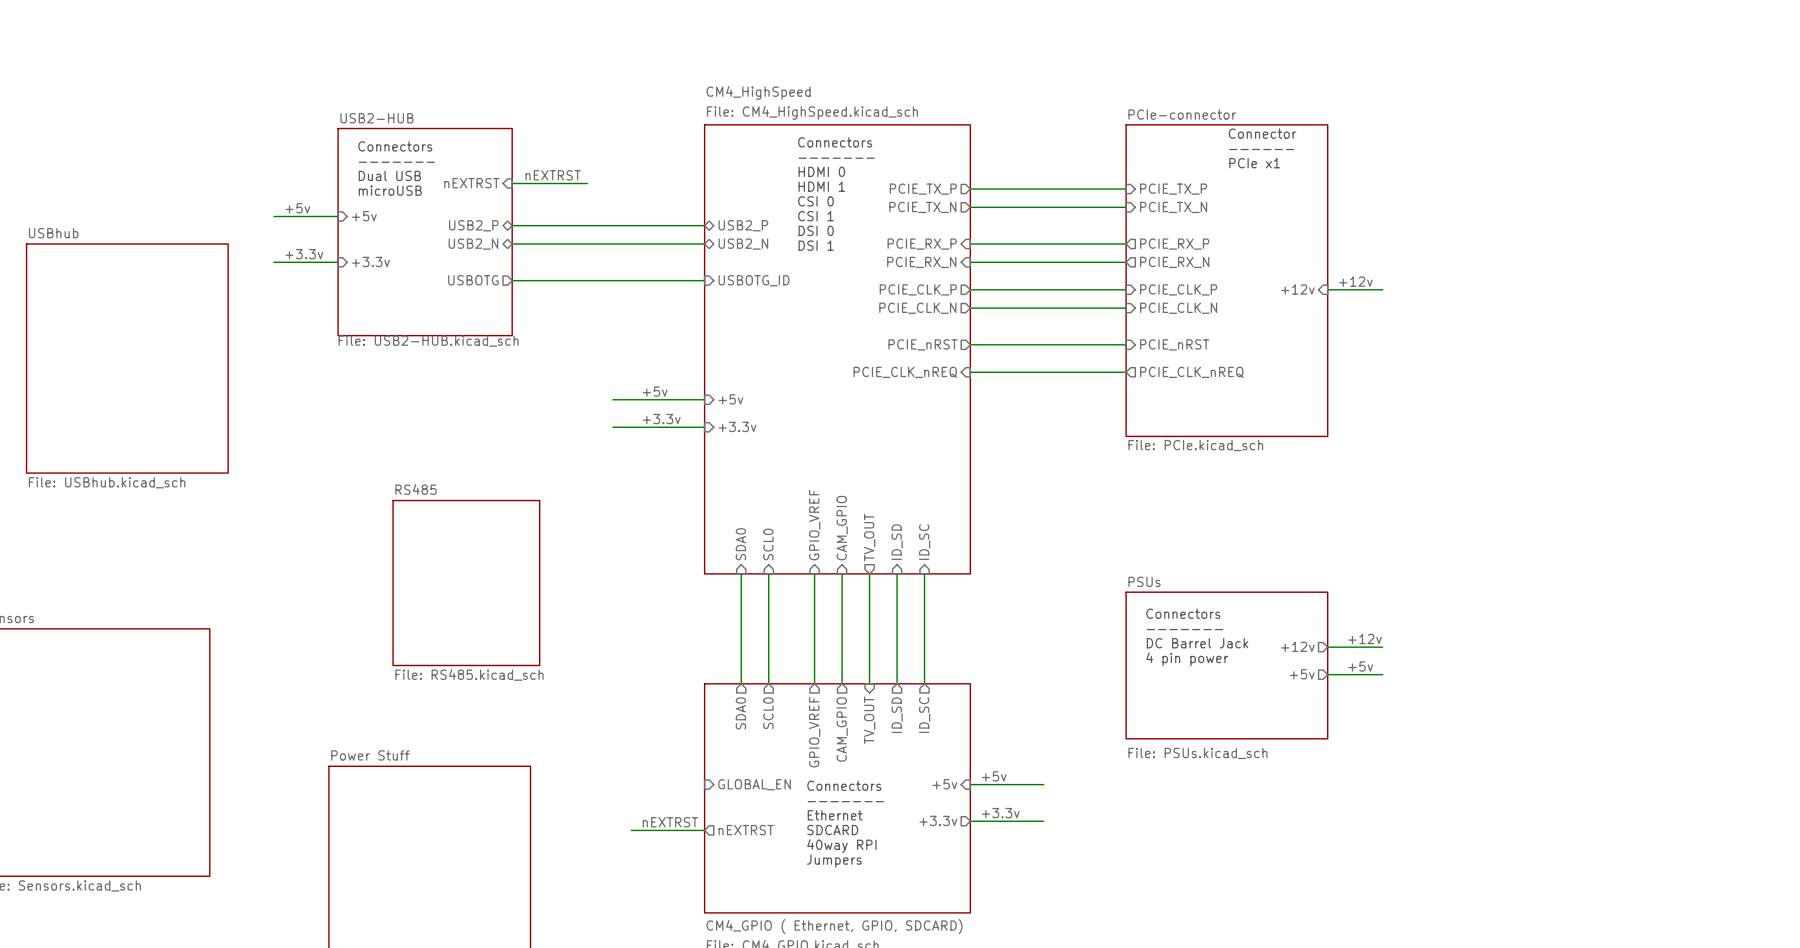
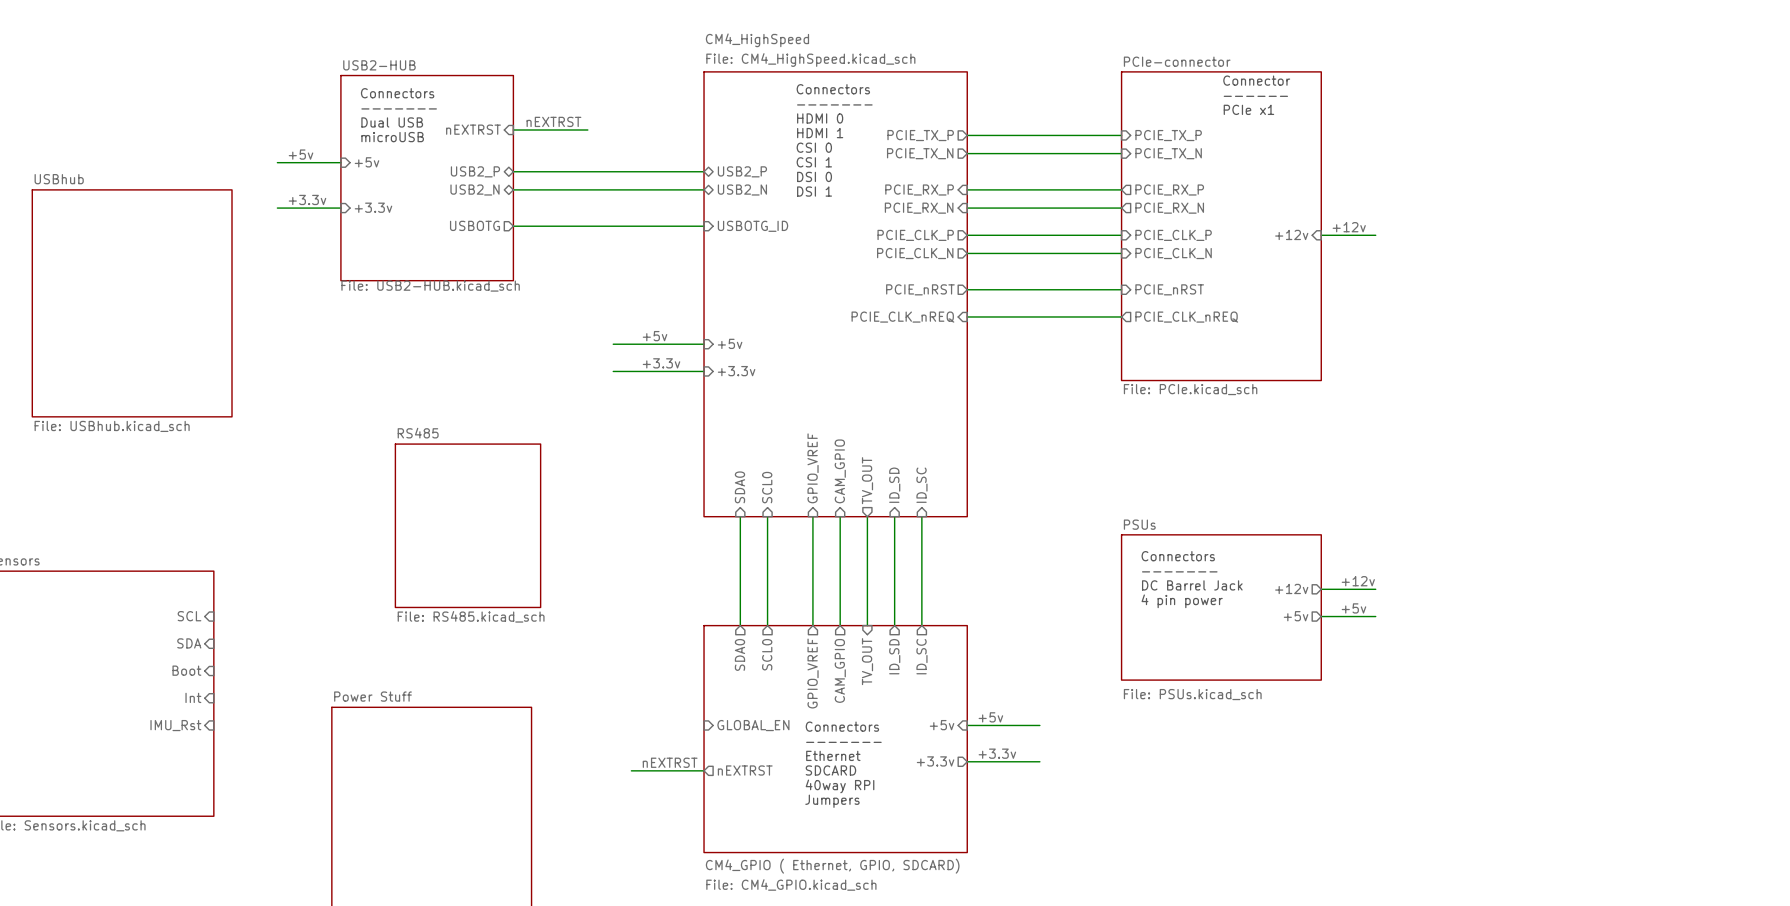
sheet pin: none -> SCL (189, 616)
sheet pin: none -> SDA (189, 643)
sheet pin: none -> Boot (186, 670)
sheet pin: none -> Int (193, 697)
sheet pin: none -> IMU_Rst (175, 725)

